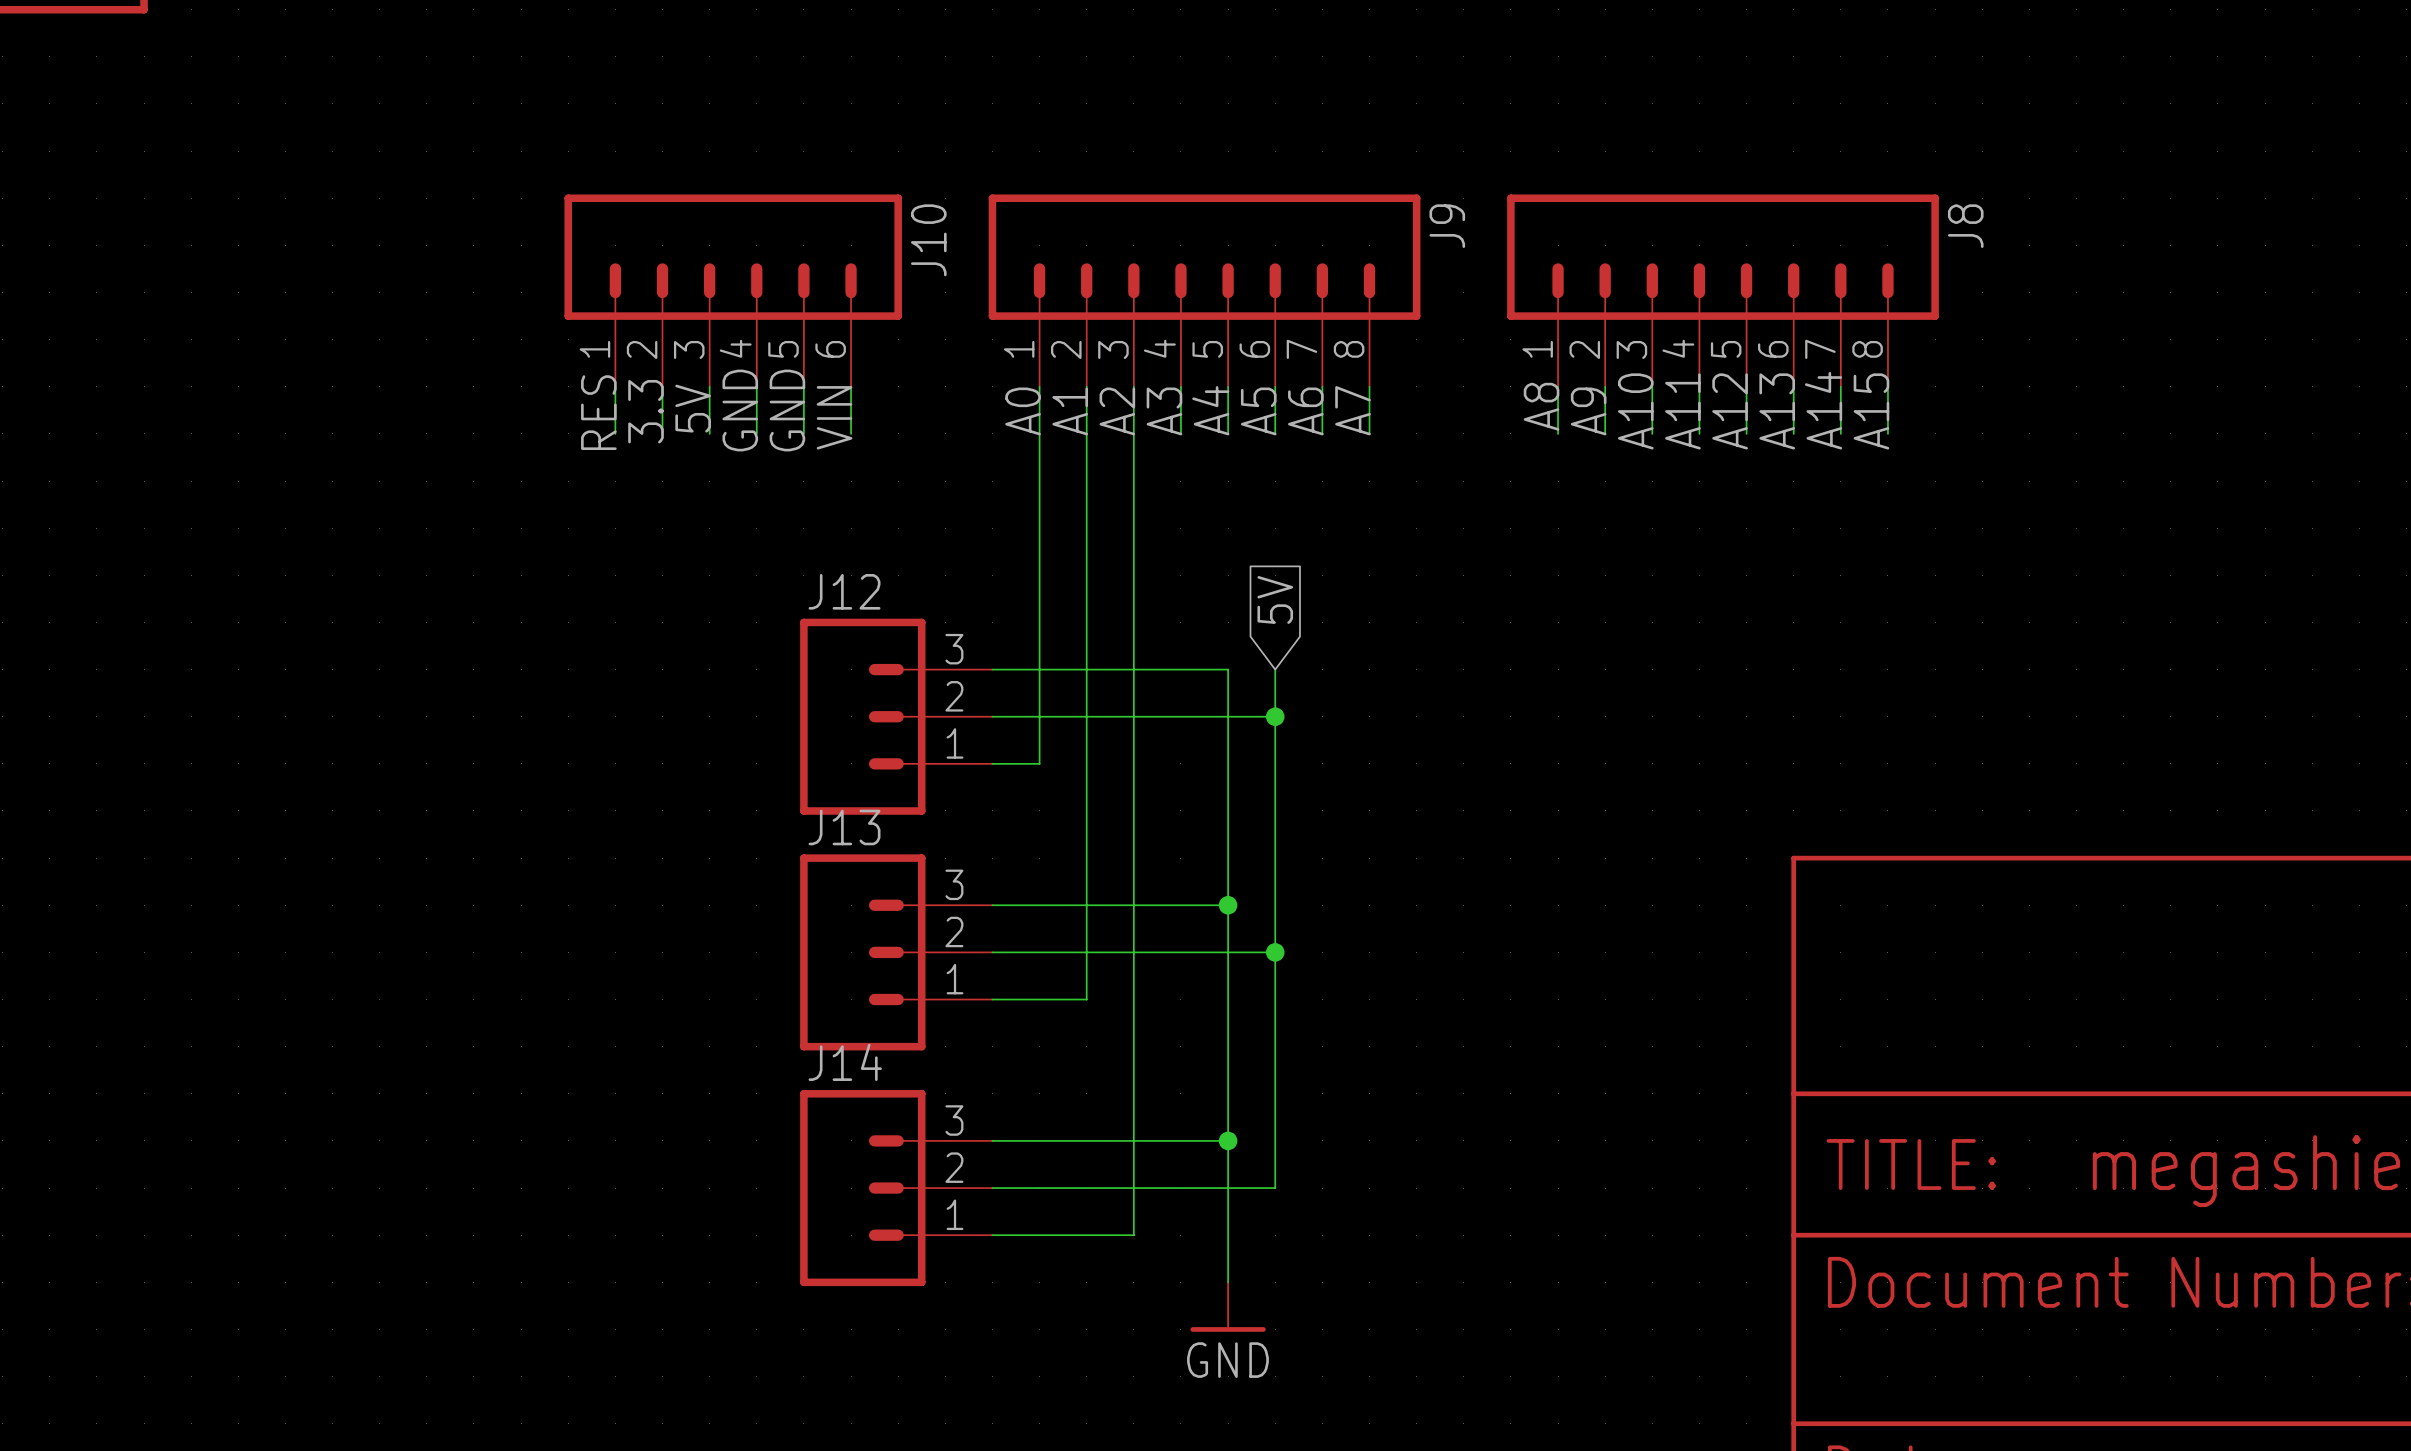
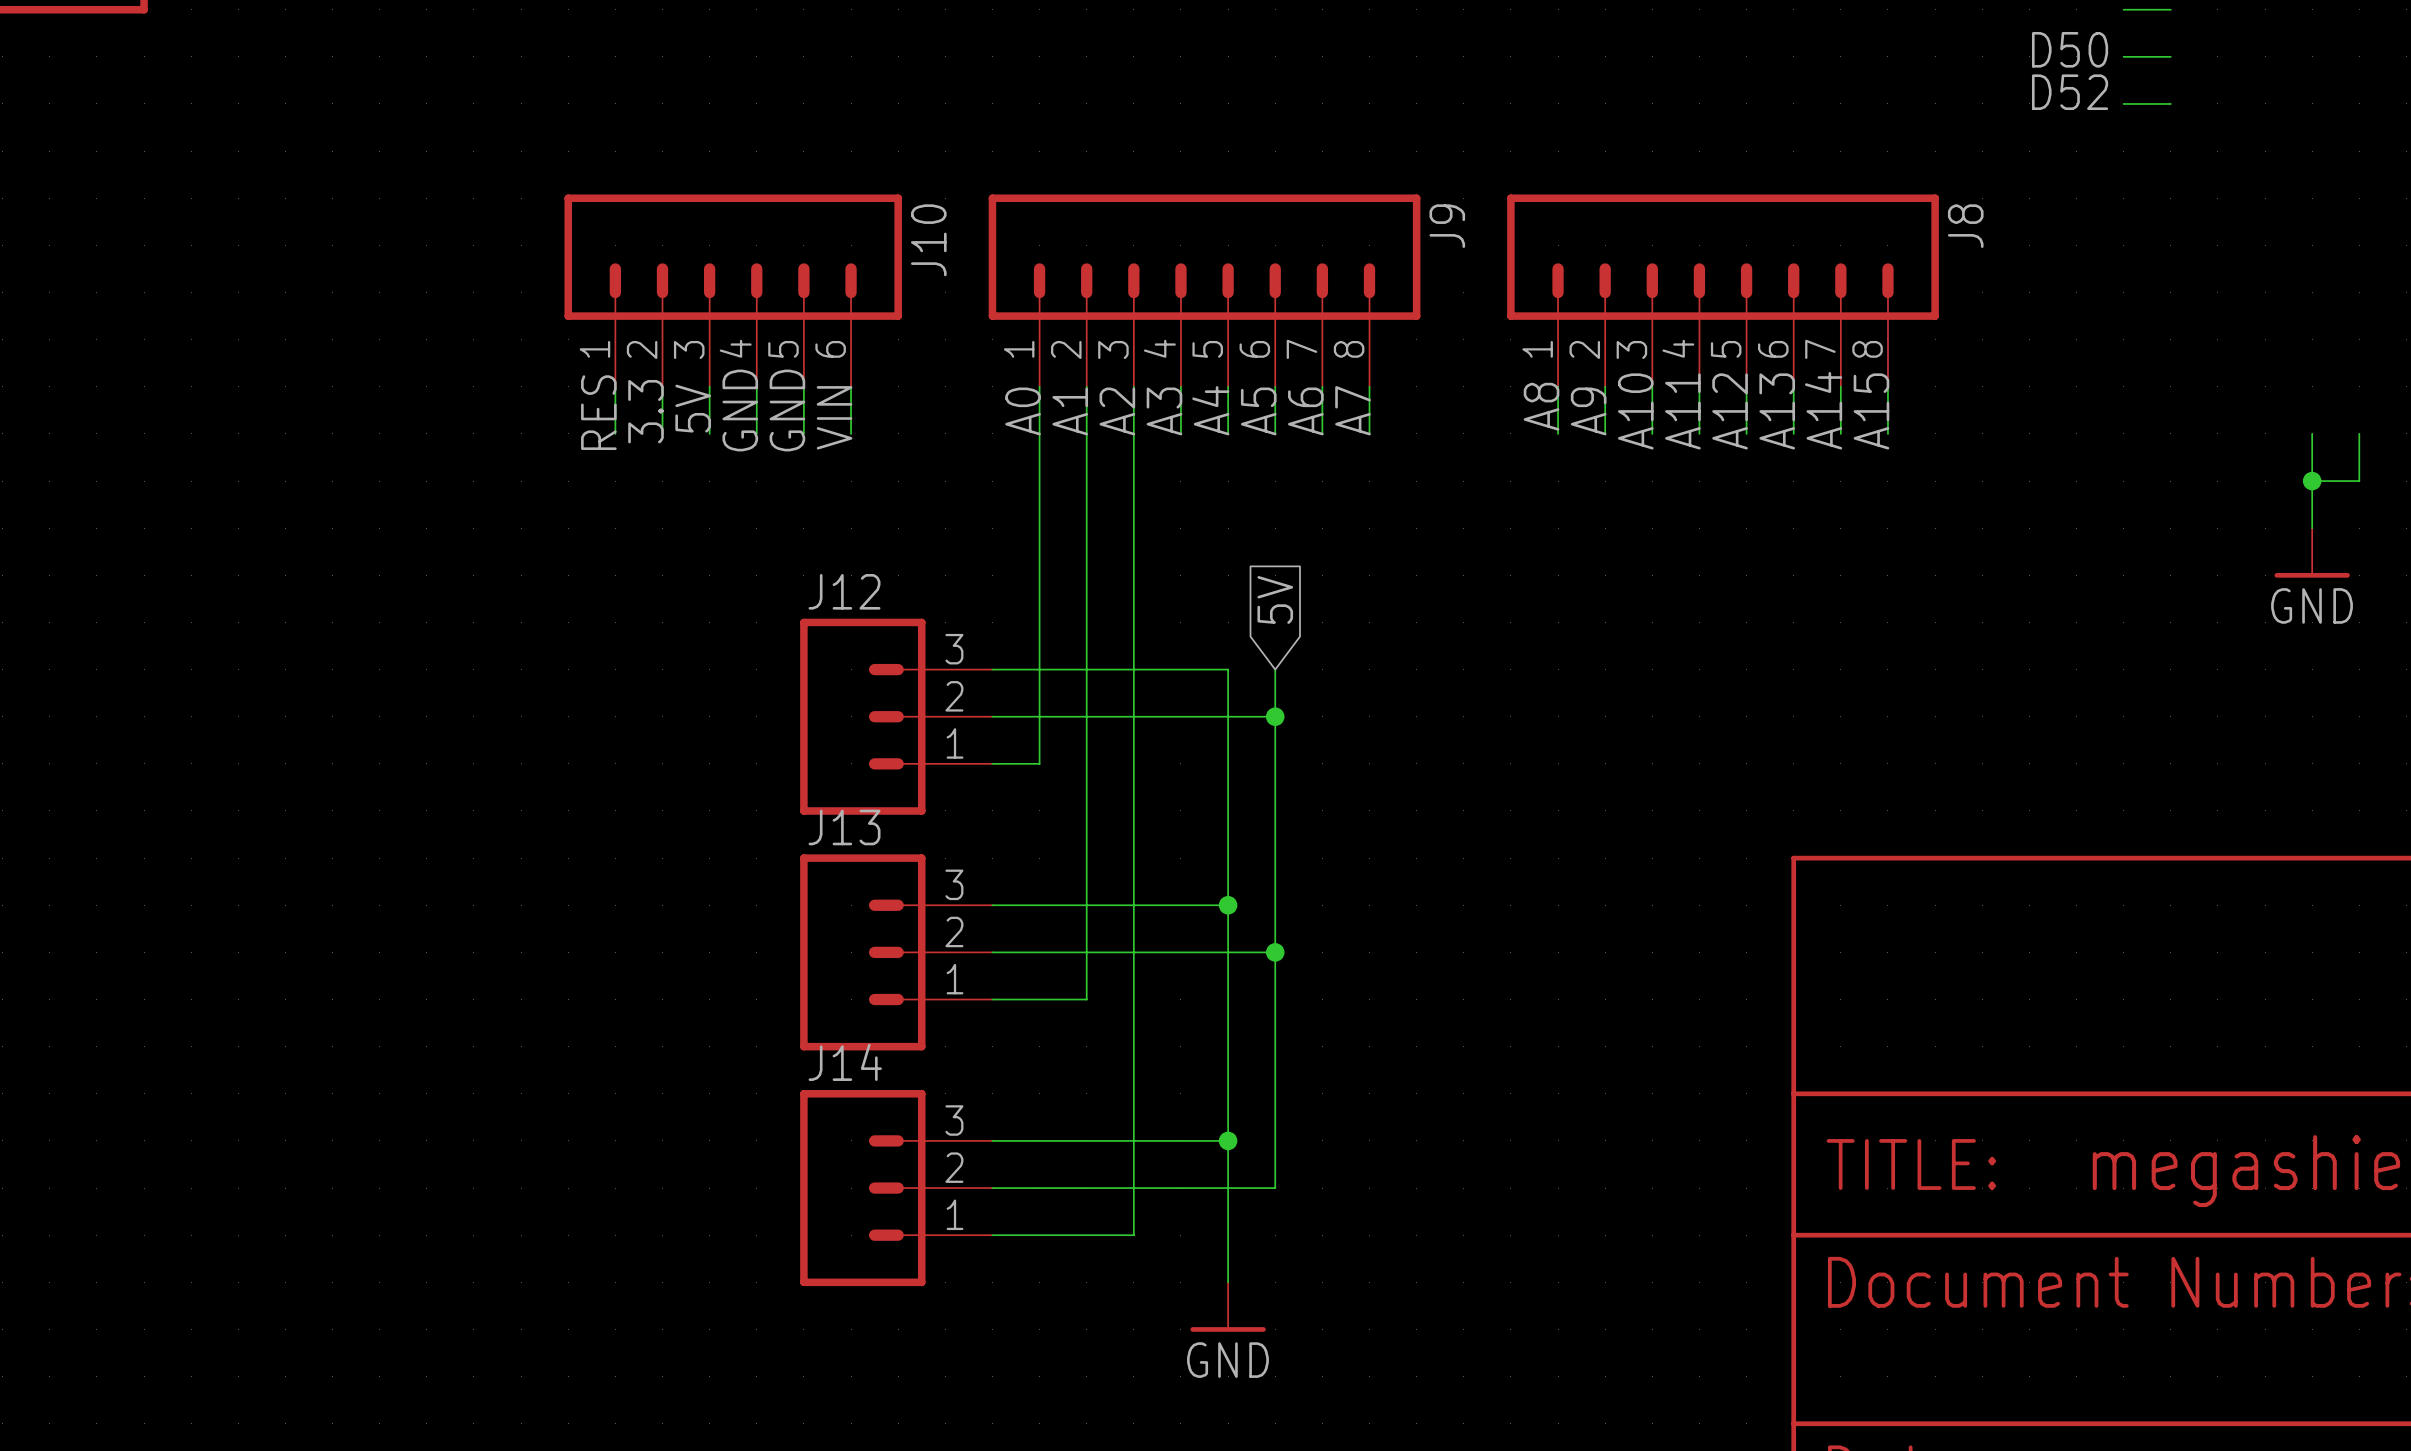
wire: none -> (2123, 9) (2170, 9)
label: none -> D50 (2070, 49)
wire: none -> (2123, 56) (2170, 56)
label: none -> D52 (2070, 92)
wire: none -> (2123, 103) (2170, 103)
wire: none -> (2312, 433) (2312, 528)
wire: none -> (2359, 433) (2359, 481) (2312, 481)
junction: none -> (2312, 481)
power symbol: none -> GND (2312, 552)

